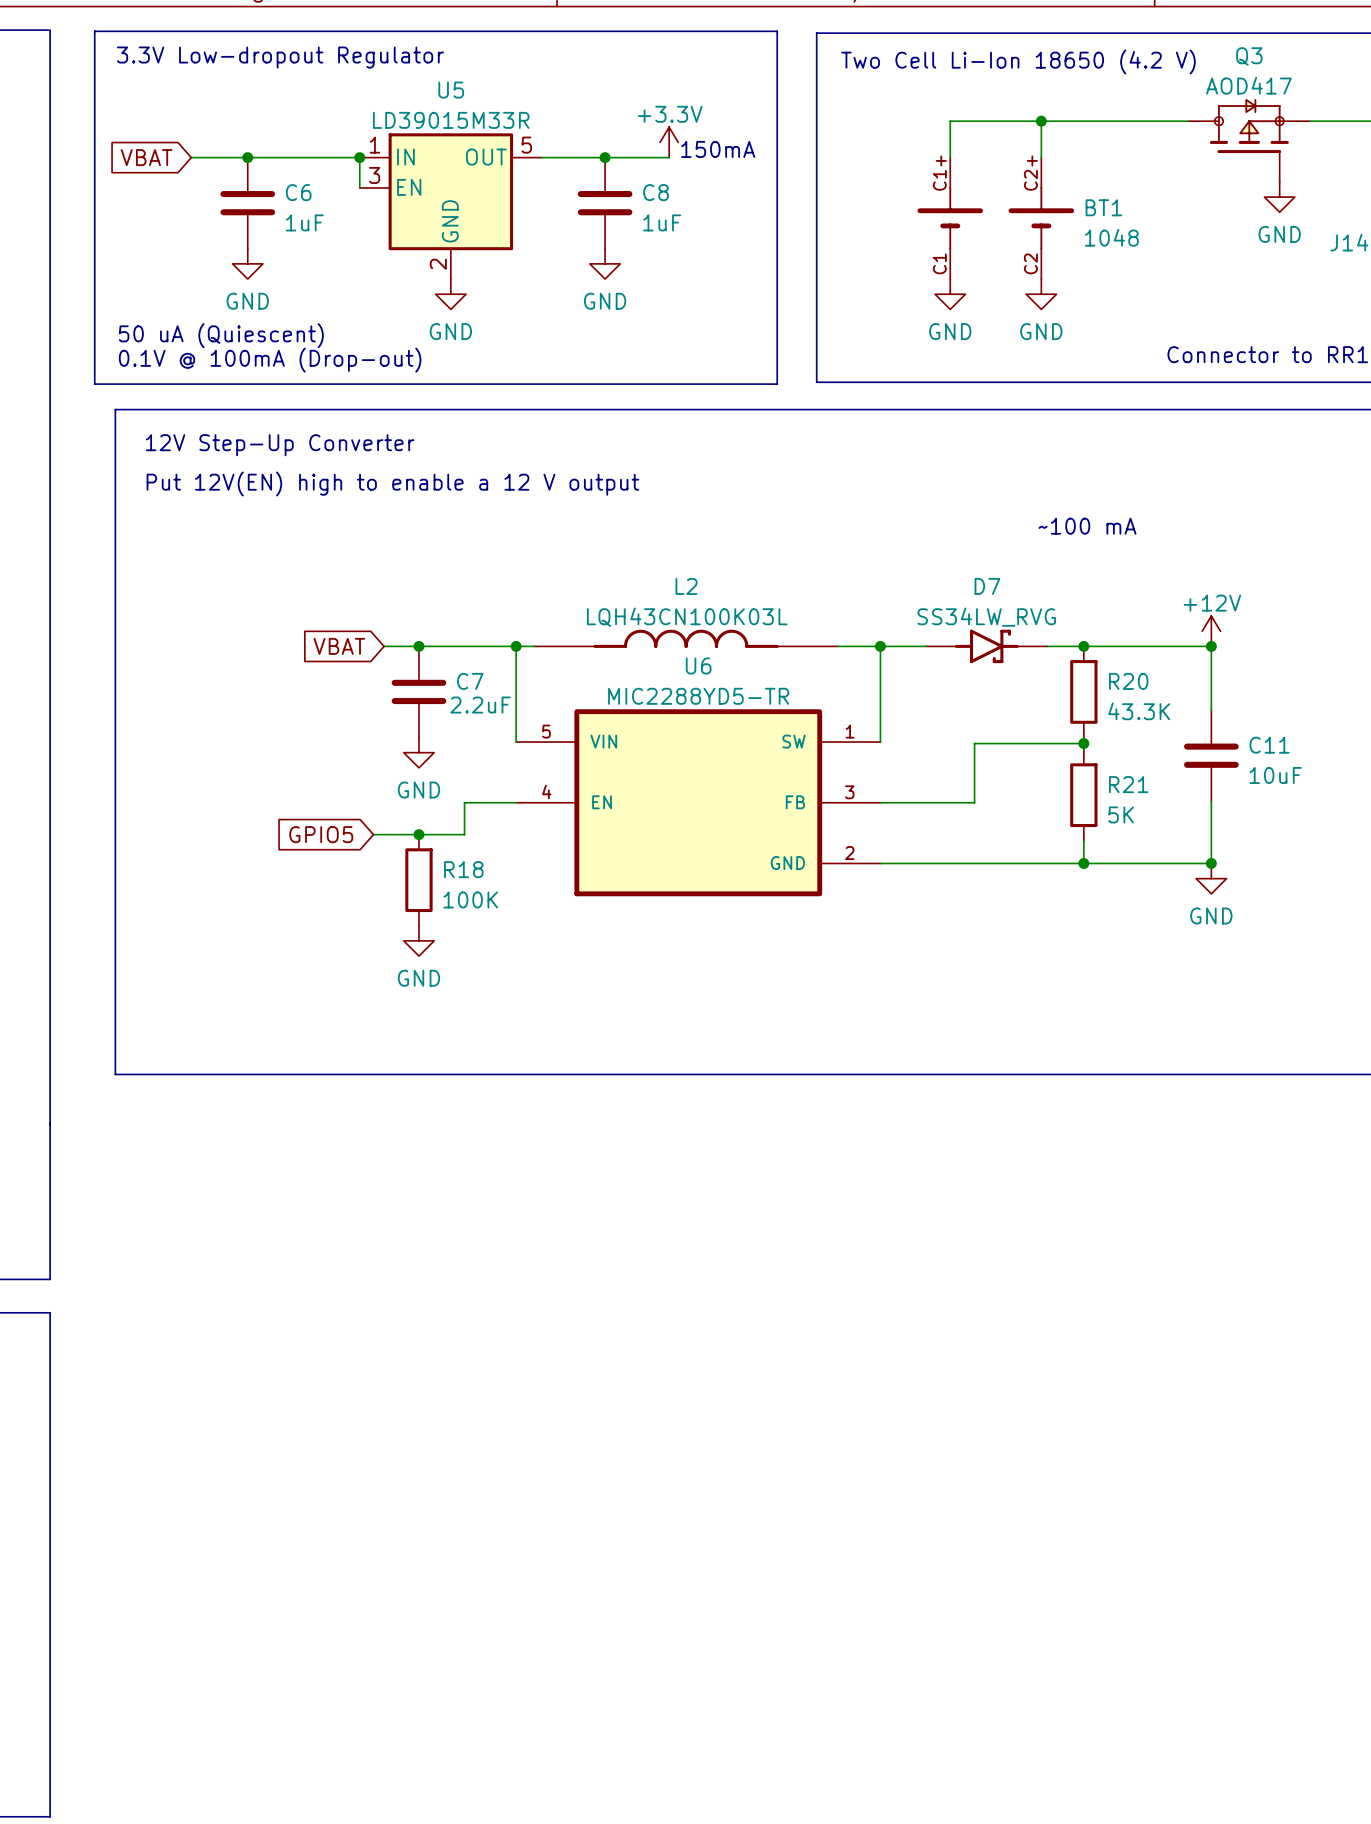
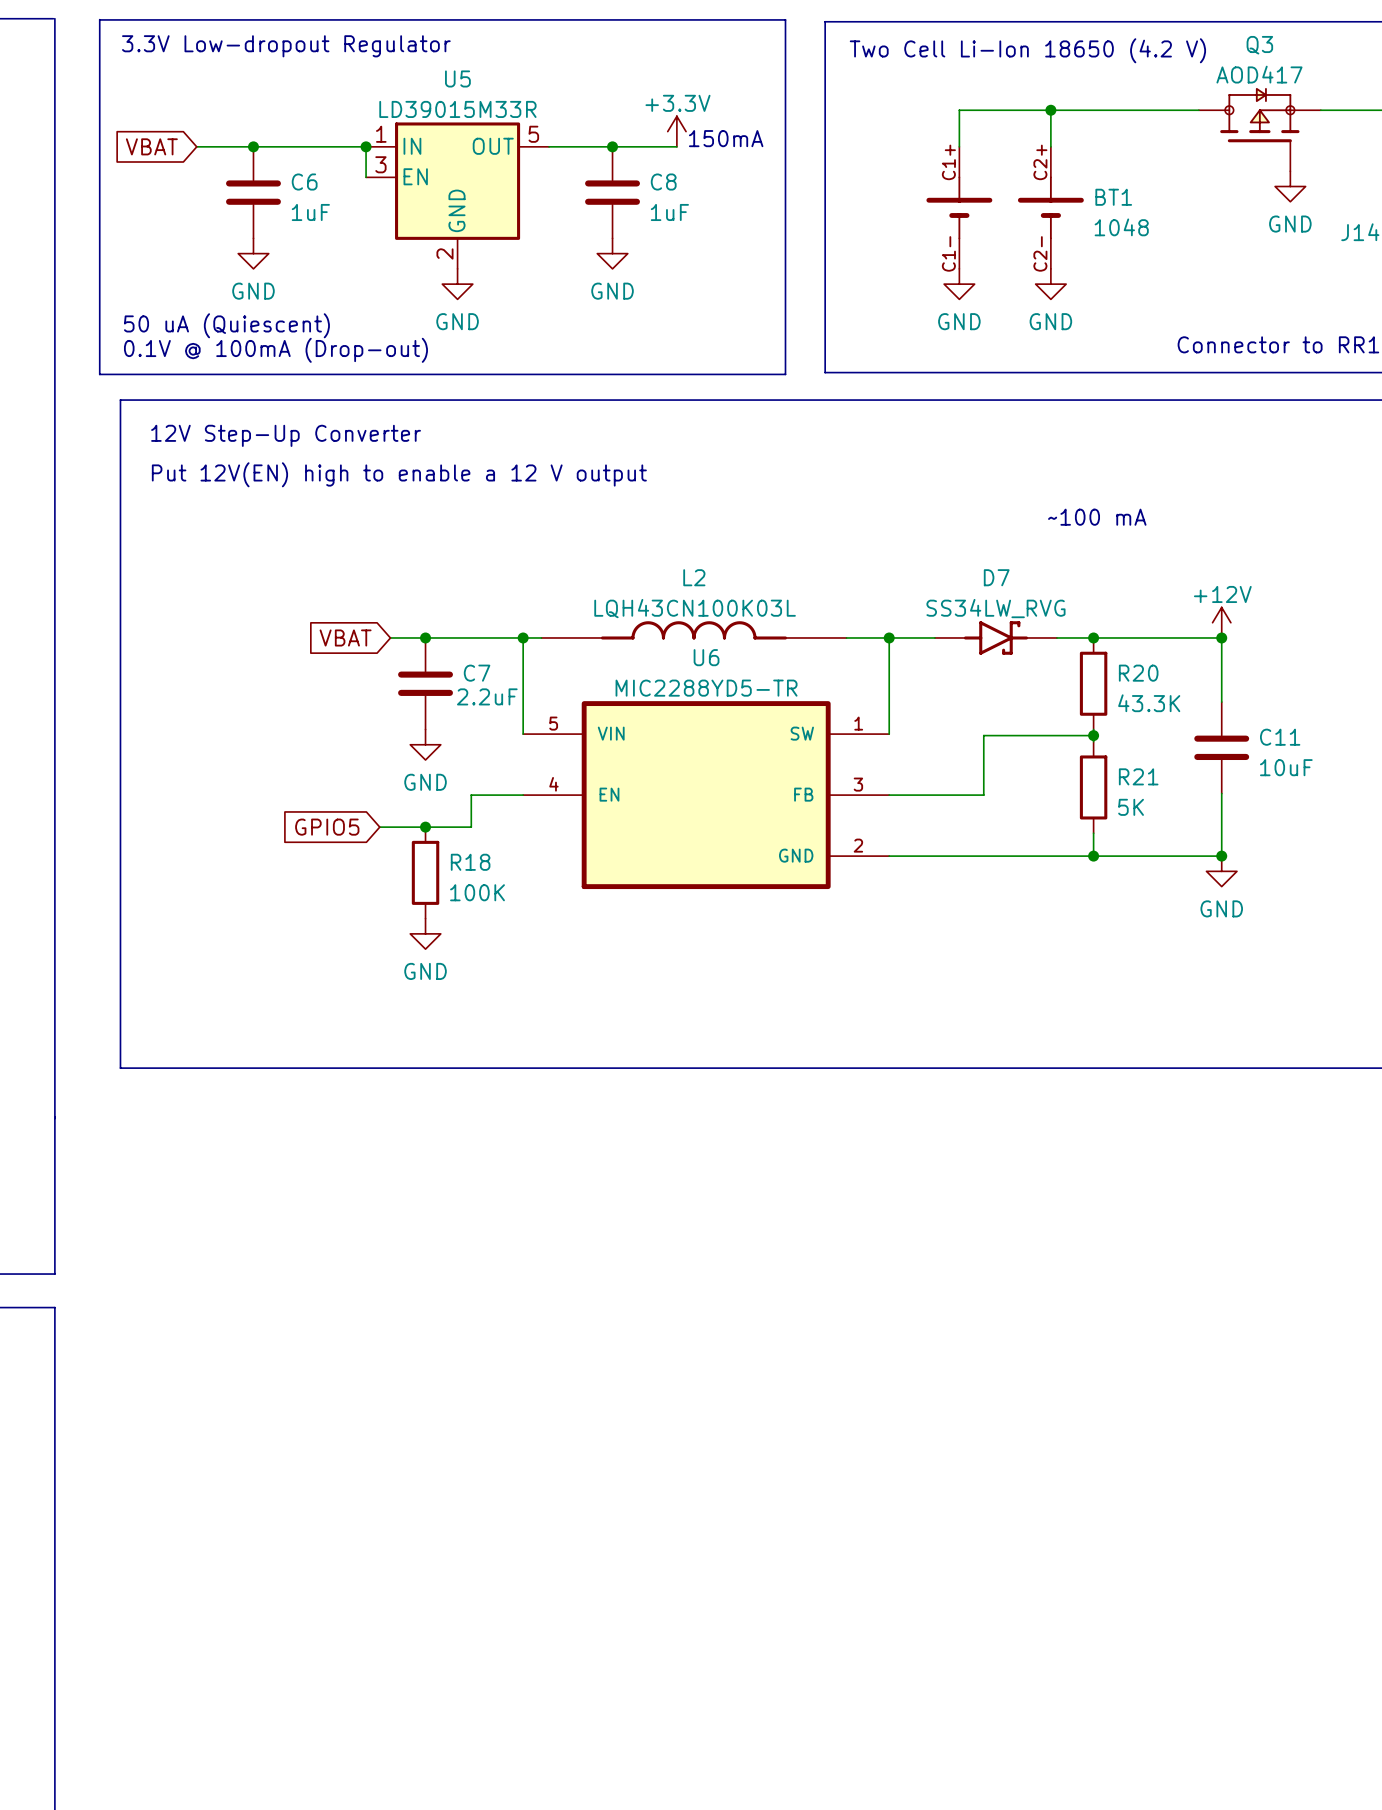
BT1 pin number: C1 (939, 263) -> C1- (948, 253)
BT1 pin number: C2 (1030, 263) -> C2- (1040, 253)

